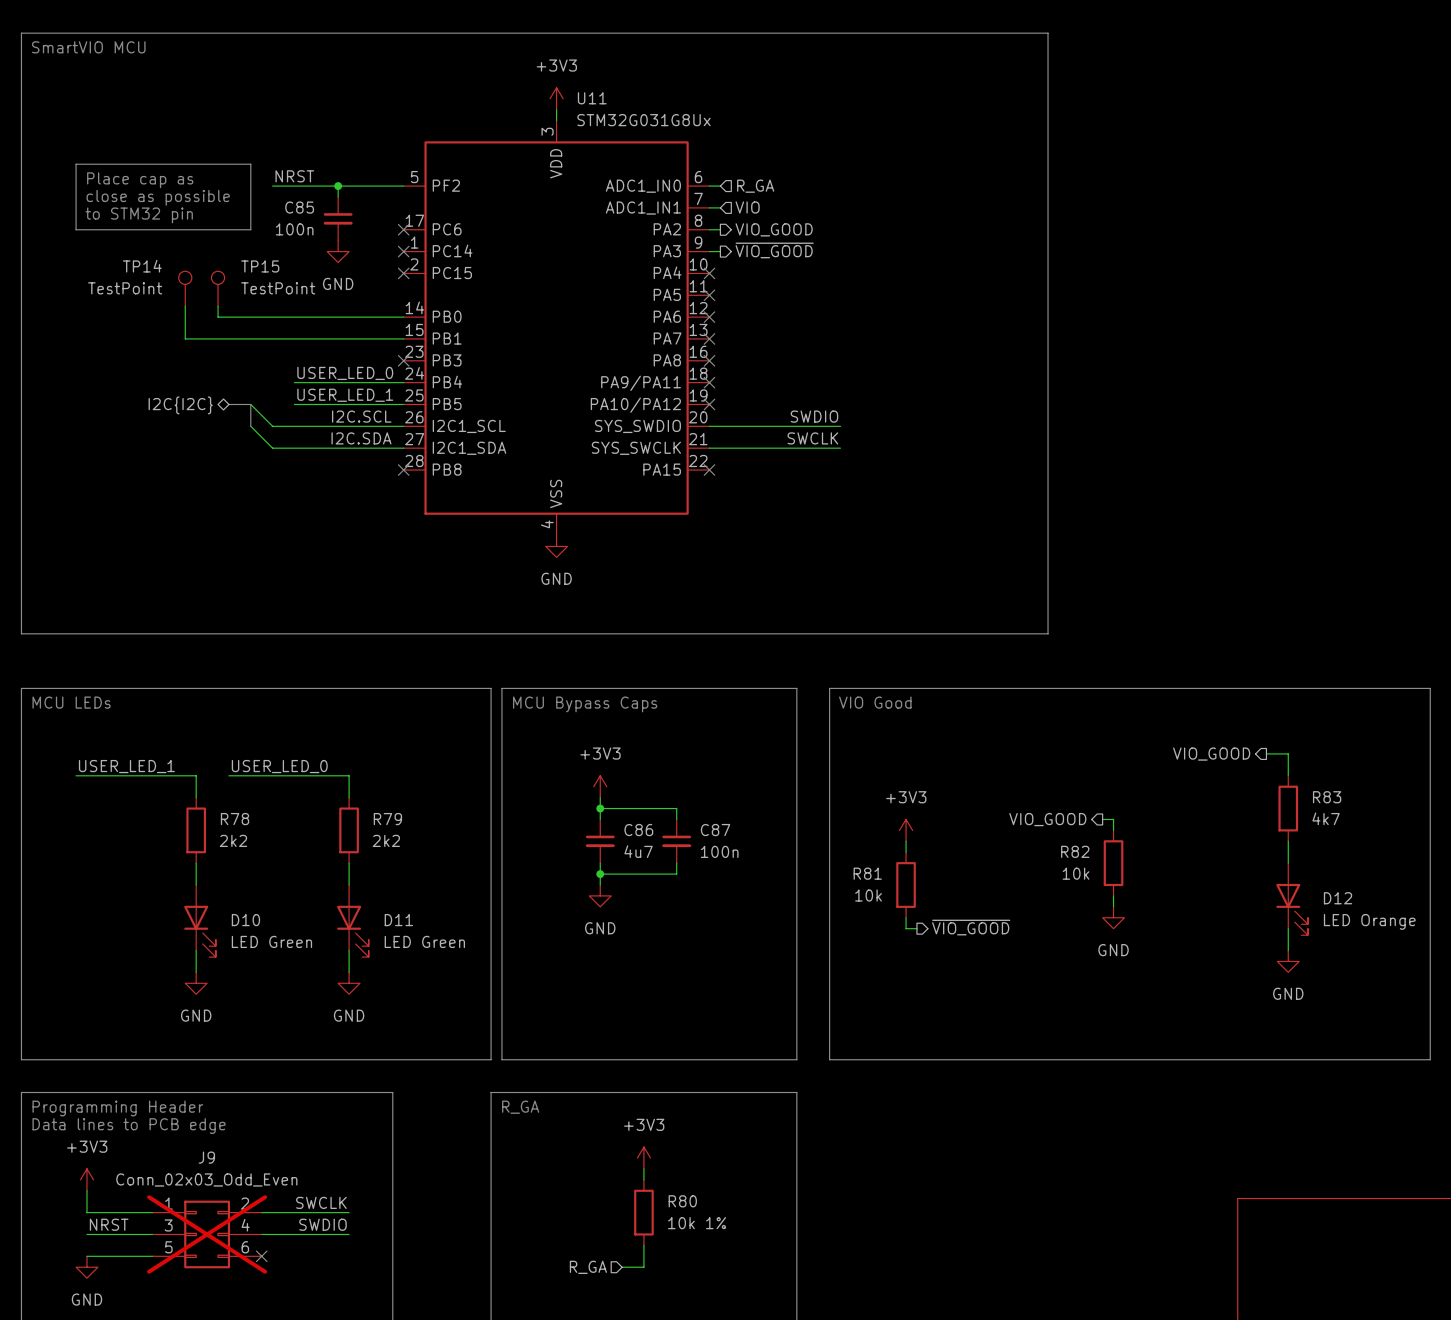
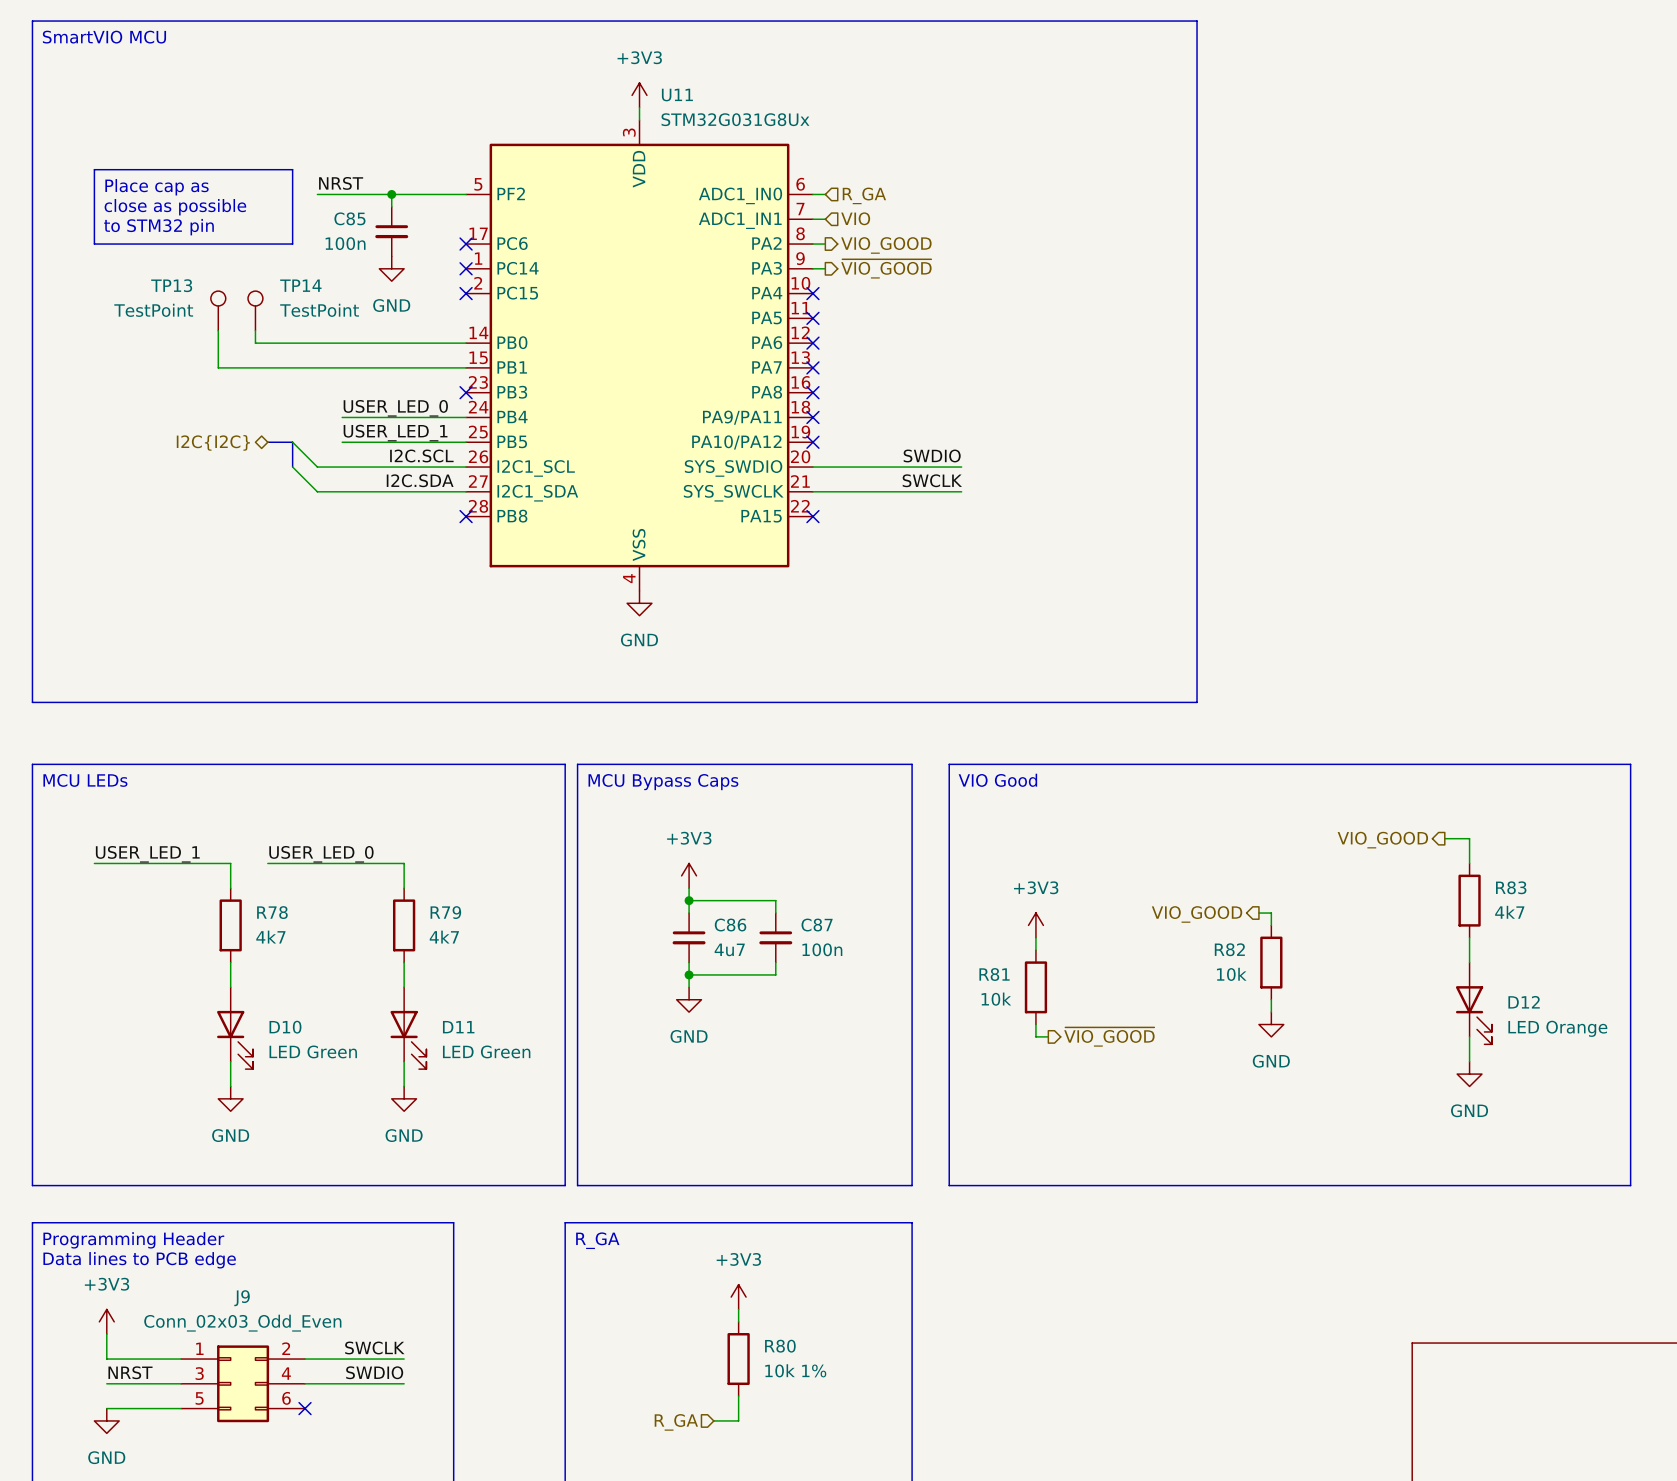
TP14 name: TP14 (142, 266) -> TP13 (171, 285)
TP15 name: TP15 (260, 266) -> TP14 (300, 285)
R78 value: 2k2 (233, 840) -> 4k7 (270, 937)
R79 value: 2k2 (386, 840) -> 4k7 (444, 937)
J9 do-not-place cross: (207, 1234) -> none

